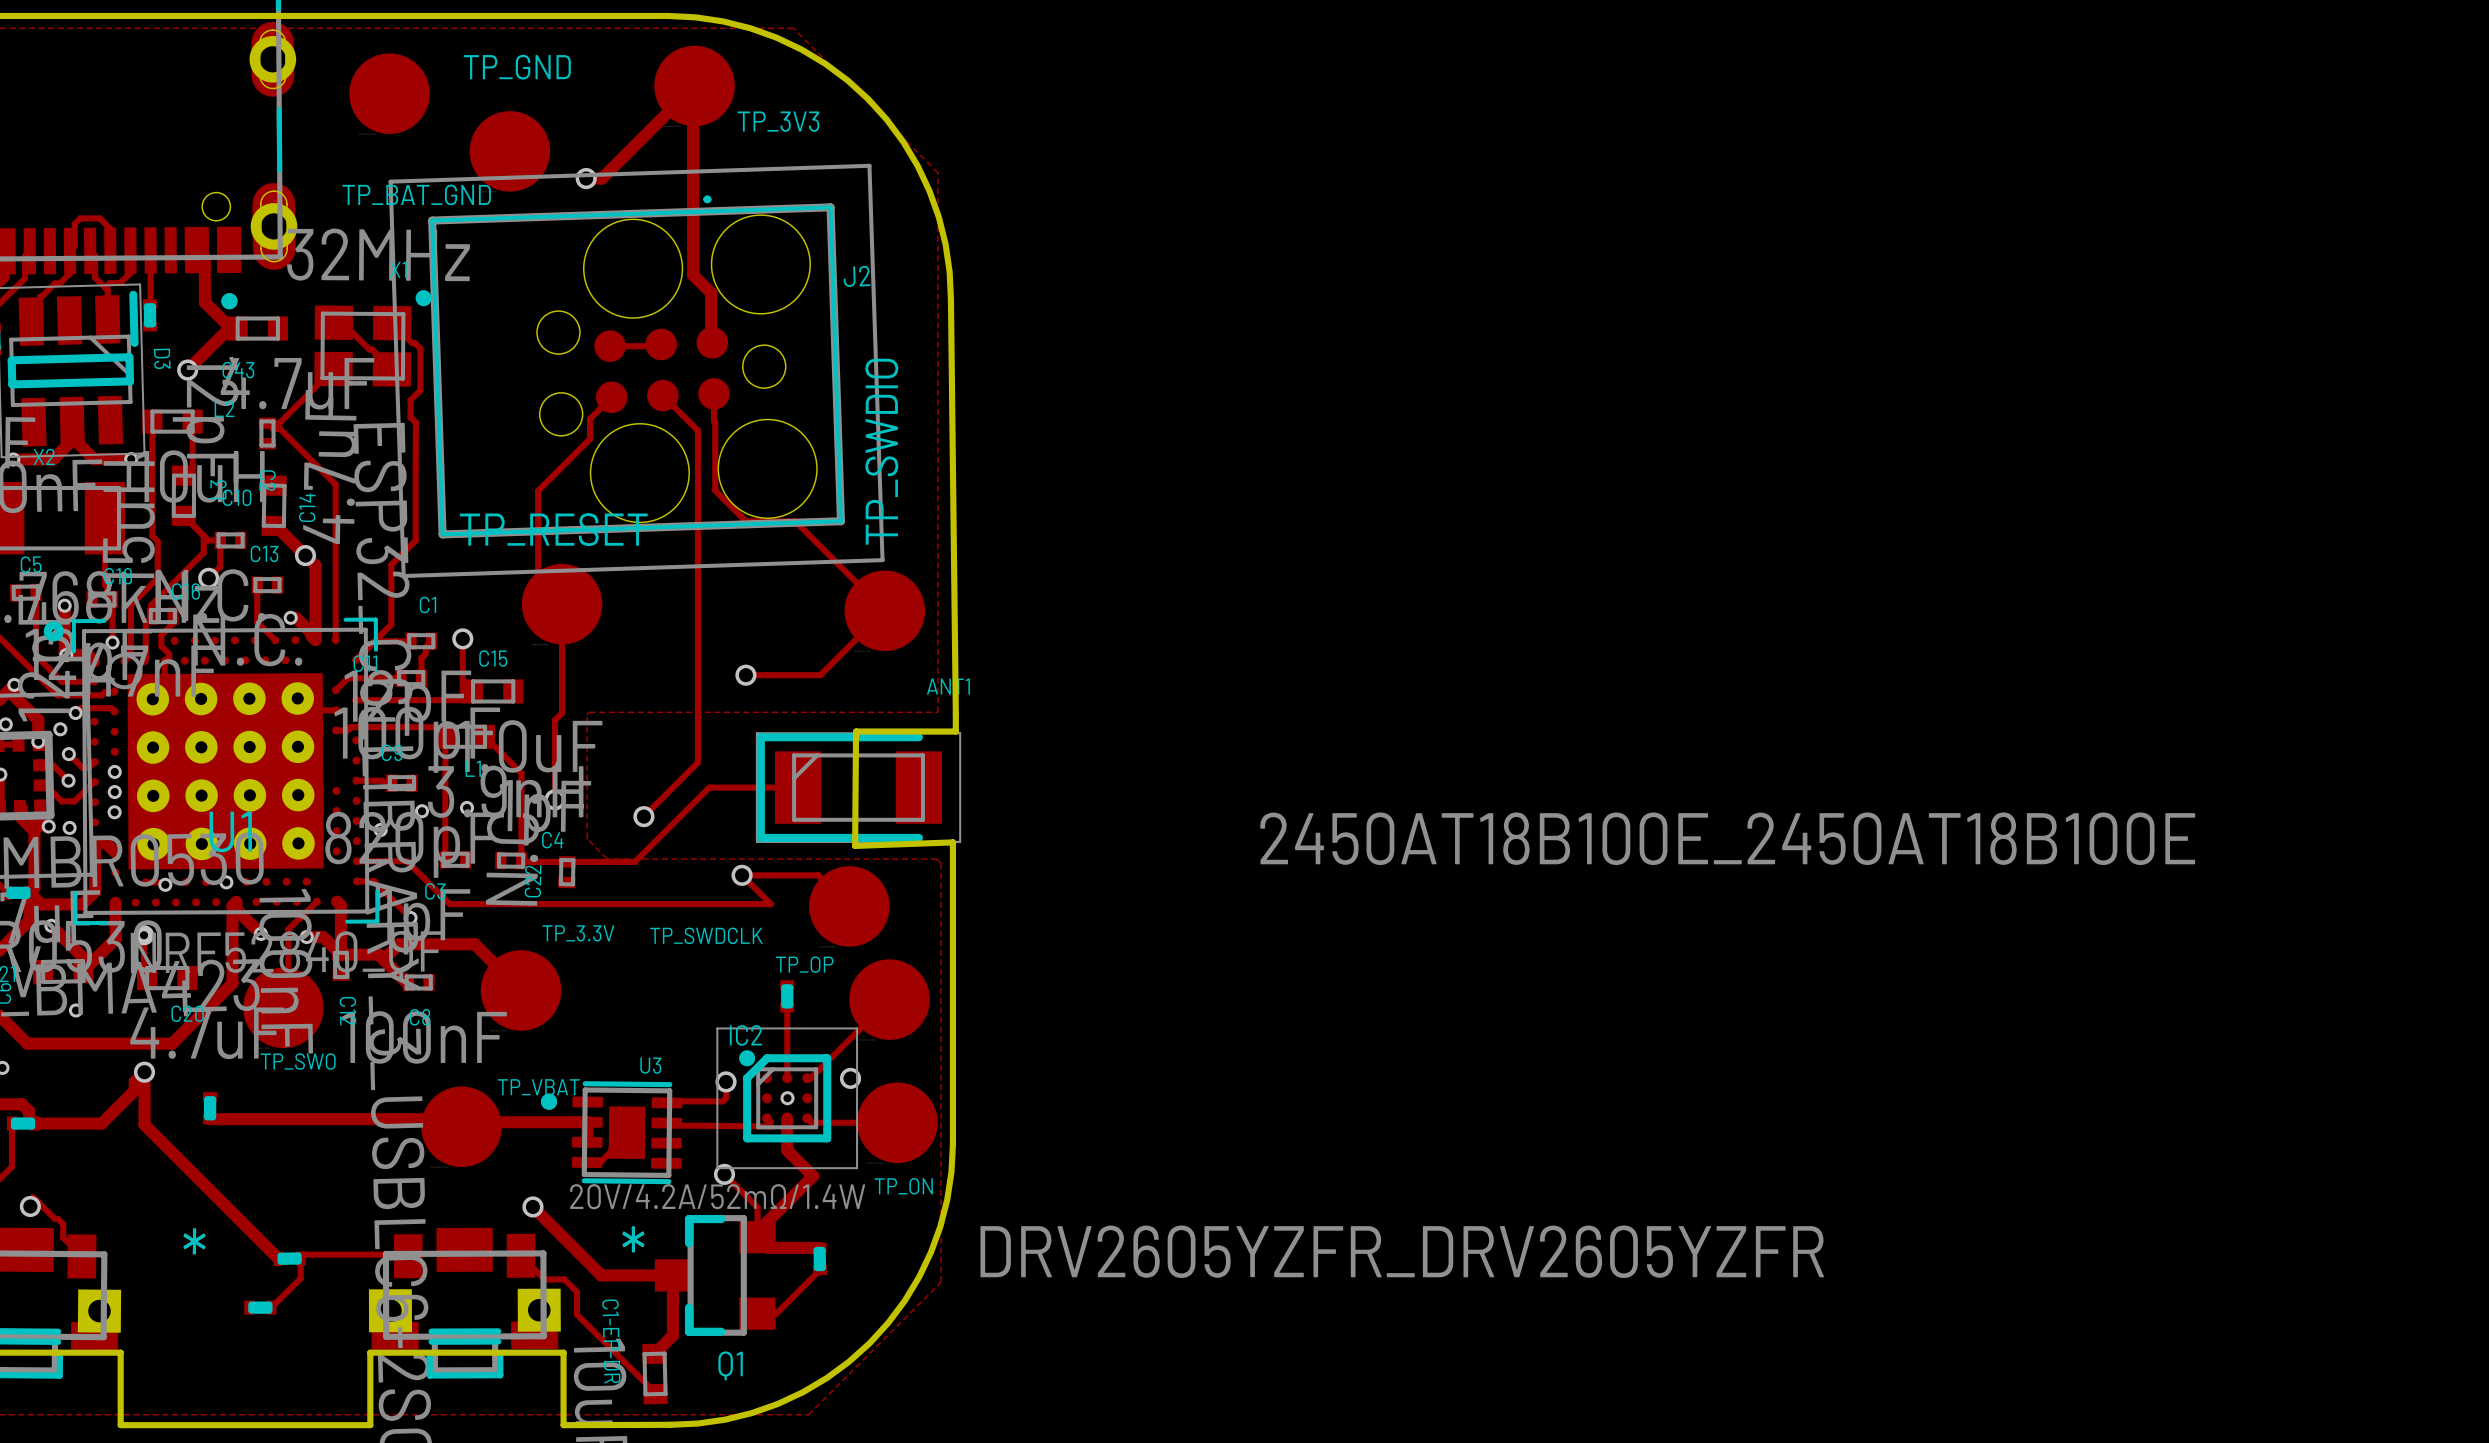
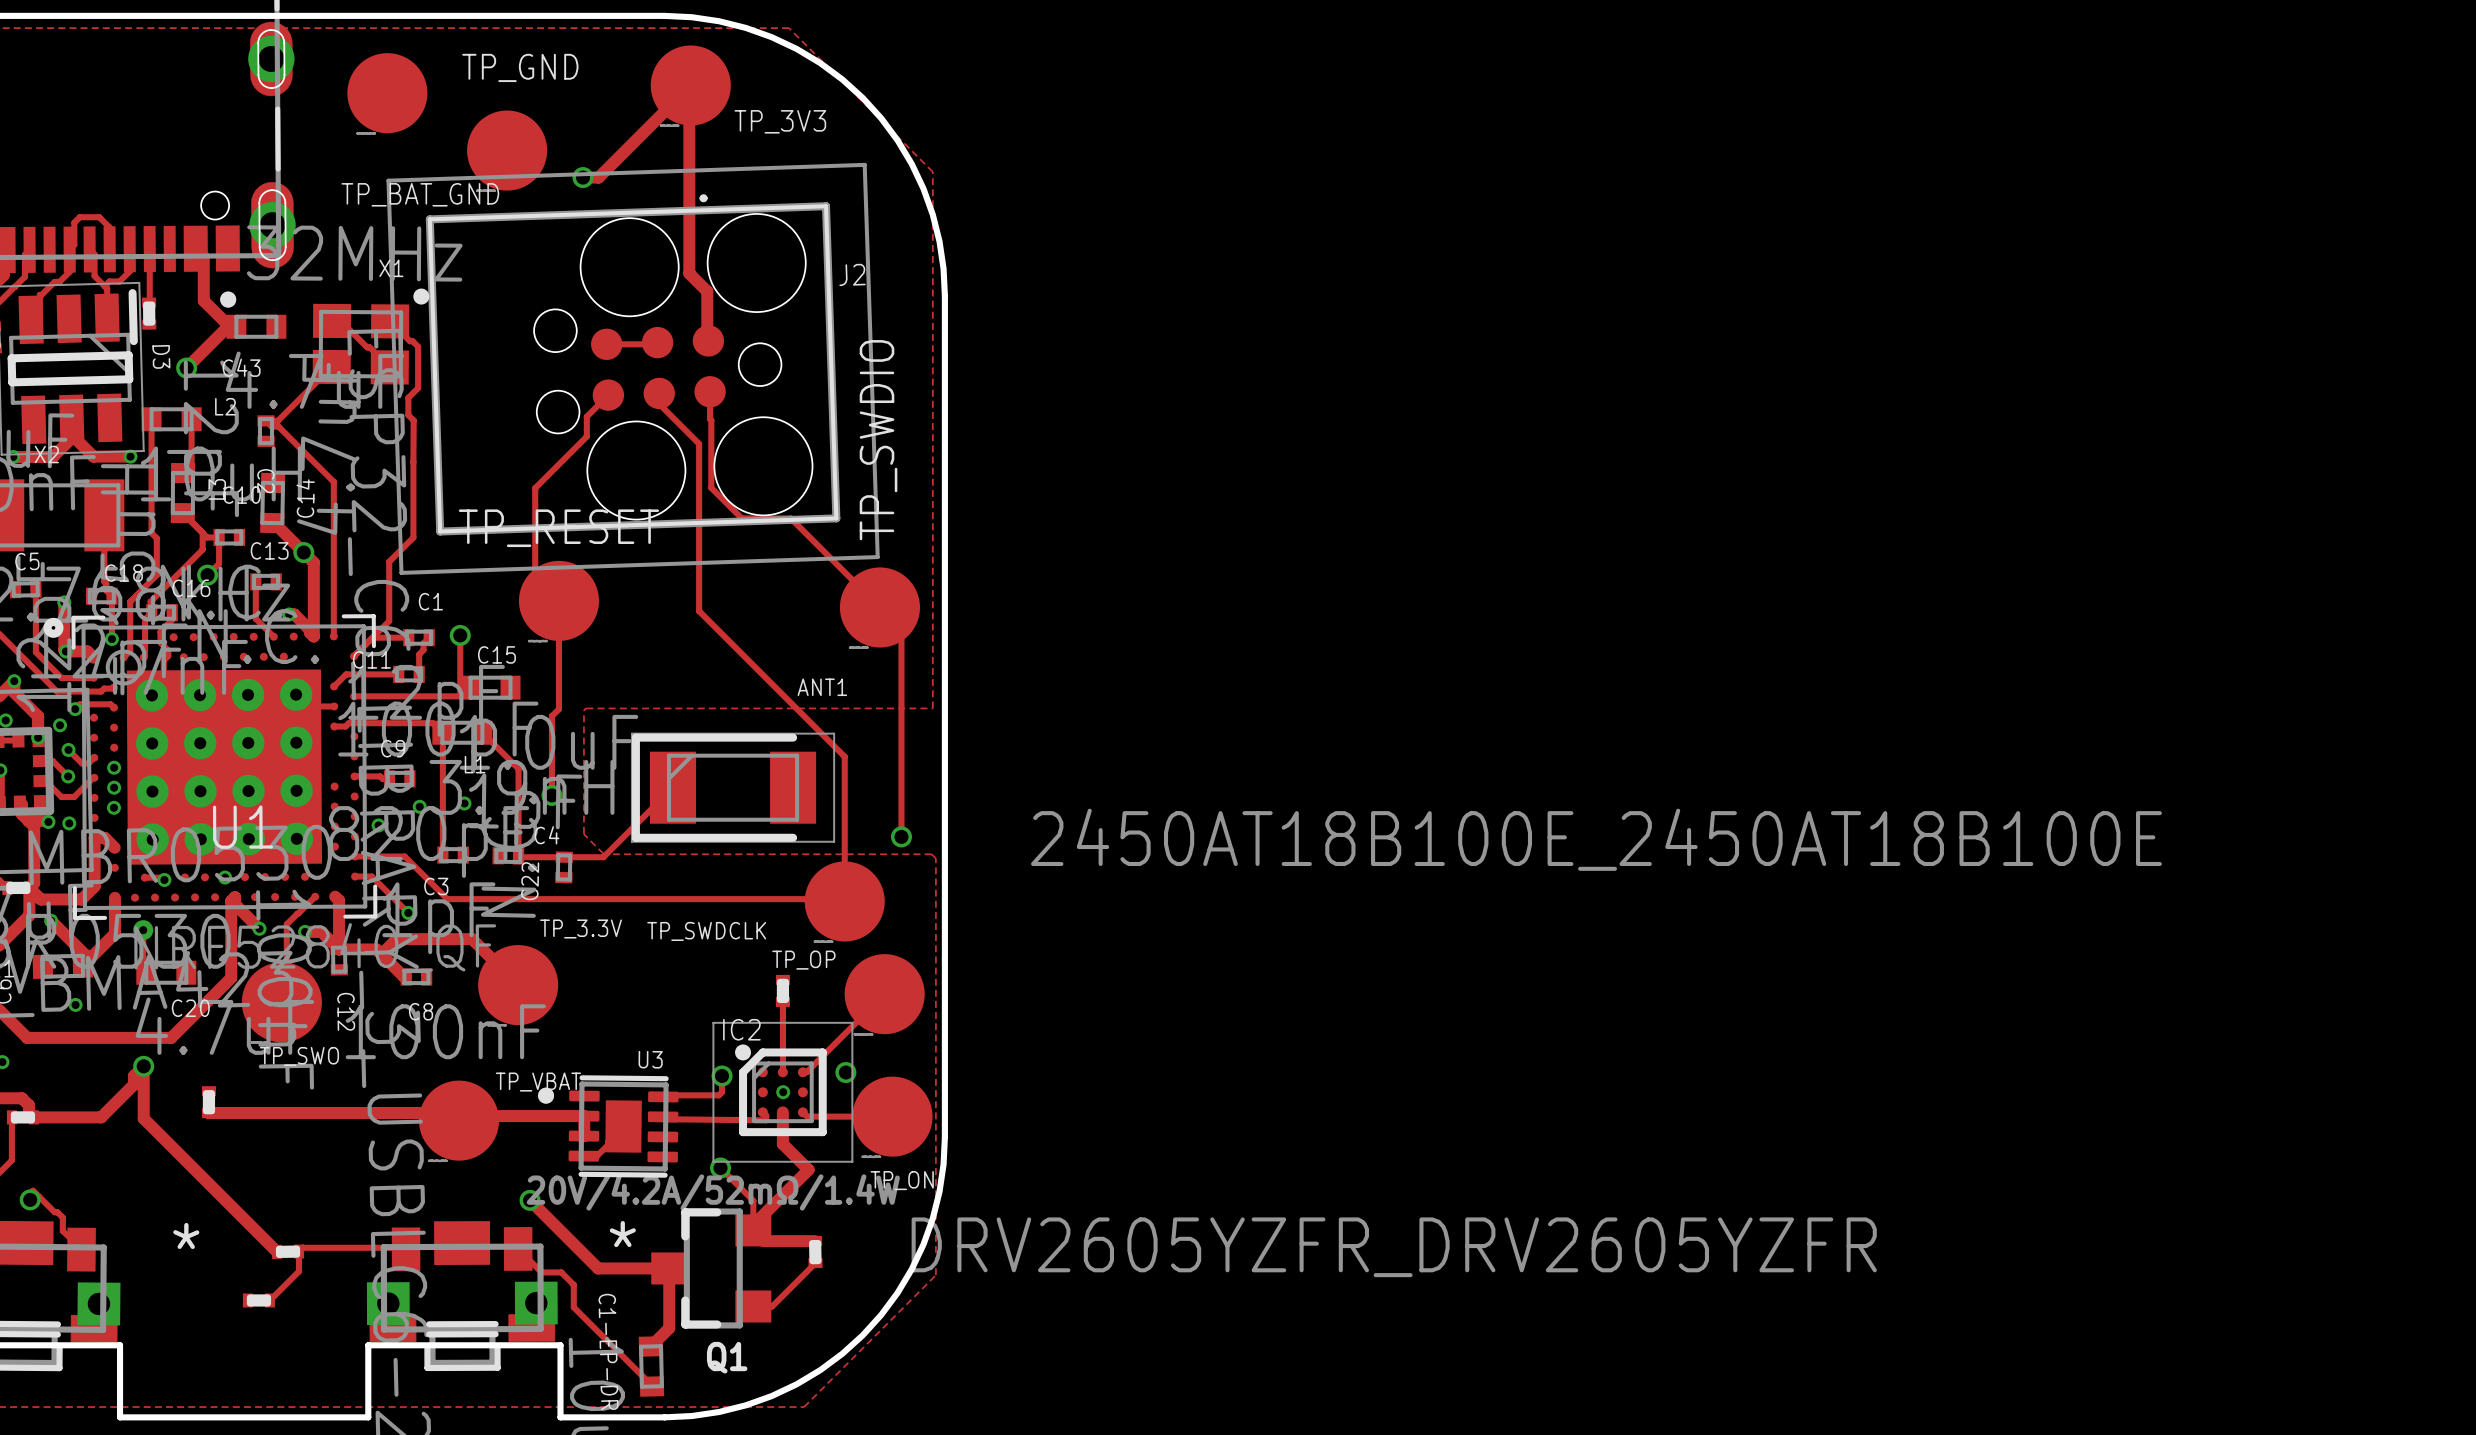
board edge: (668, 15) (723, 21) (750, 28) (801, 49) (847, 80) (886, 119) (917, 165) (929, 191) (945, 244) (950, 299) (955, 731) (856, 731) (855, 845) (952, 842) (951, 1172) (940, 1226) (919, 1277) (888, 1322) (849, 1361) (826, 1378) (778, 1403) (725, 1419) (670, 1424) (563, 1425) -> (664, 15) (719, 21) (771, 37) (796, 48) (842, 79) (881, 118) (911, 164) (923, 188) (939, 241) (944, 296) (943, 1164) (932, 1218) (923, 1244) (897, 1292) (862, 1335) (820, 1370) (771, 1396) (719, 1411) (664, 1417) (560, 1417)
track: (662, 395) (697, 430) (697, 762) (643, 816) -> (659, 393) (659, 404) (699, 443) (699, 611) (844, 756) (844, 901)
track: (884, 610) (820, 675) (745, 675) -> (879, 607) (901, 628) (901, 836)
via: (745, 675) -> none
track: (798, 787) (709, 787) (634, 861) (606, 861) -> (672, 787) (603, 857)
ANT1 position: (858, 787) -> (733, 787)
via: (643, 816) -> none
via: none -> (901, 836)
via: (742, 875) -> none
track: (770, 904) (742, 875) (818, 875) (847, 904) -> (766, 899) (842, 899)

